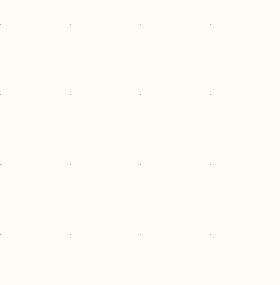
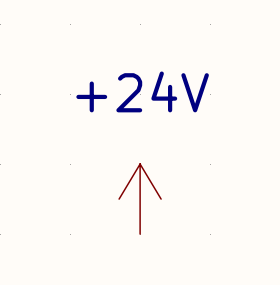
power symbol: none -> +24V (140, 199)

